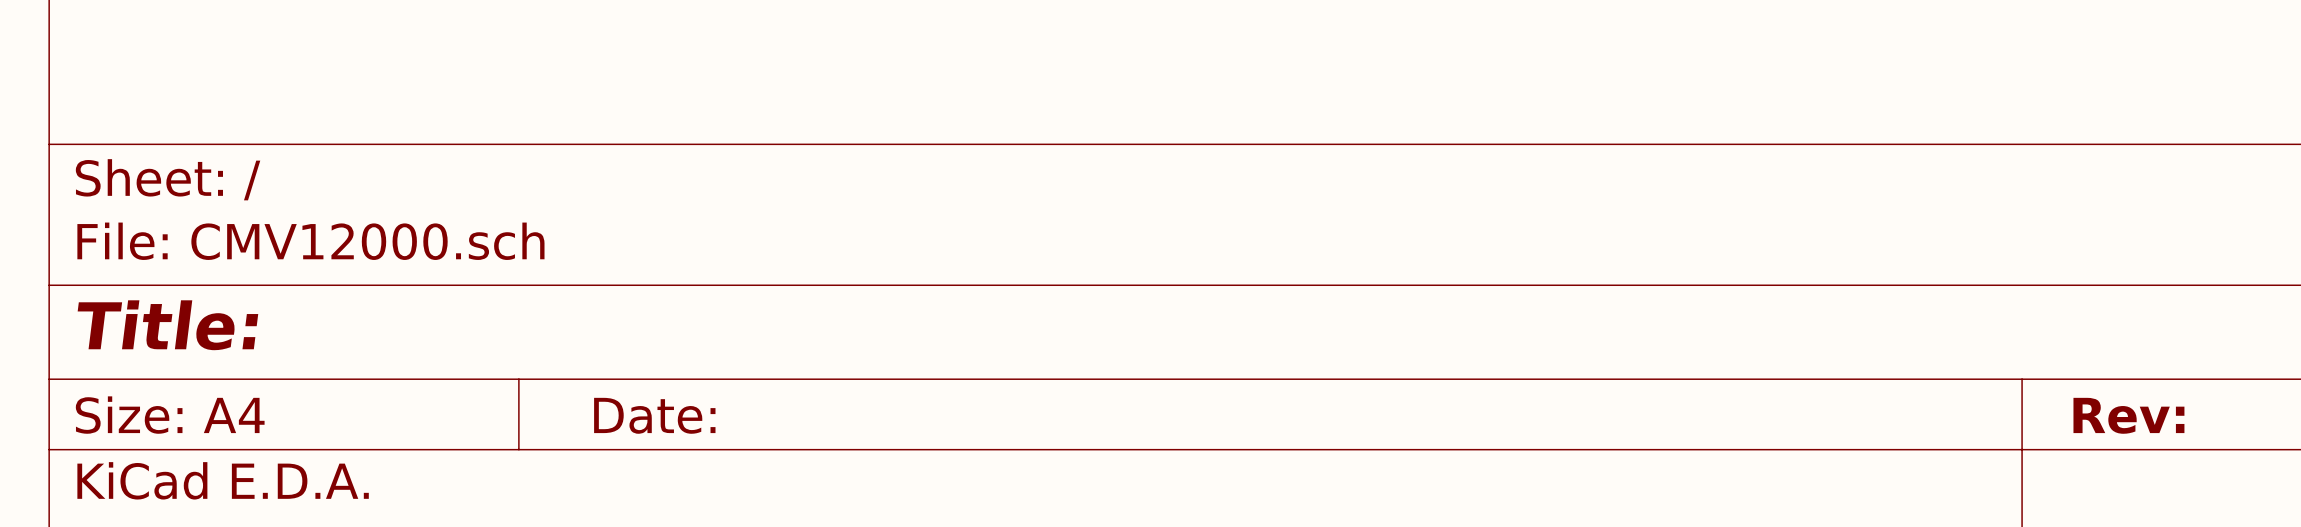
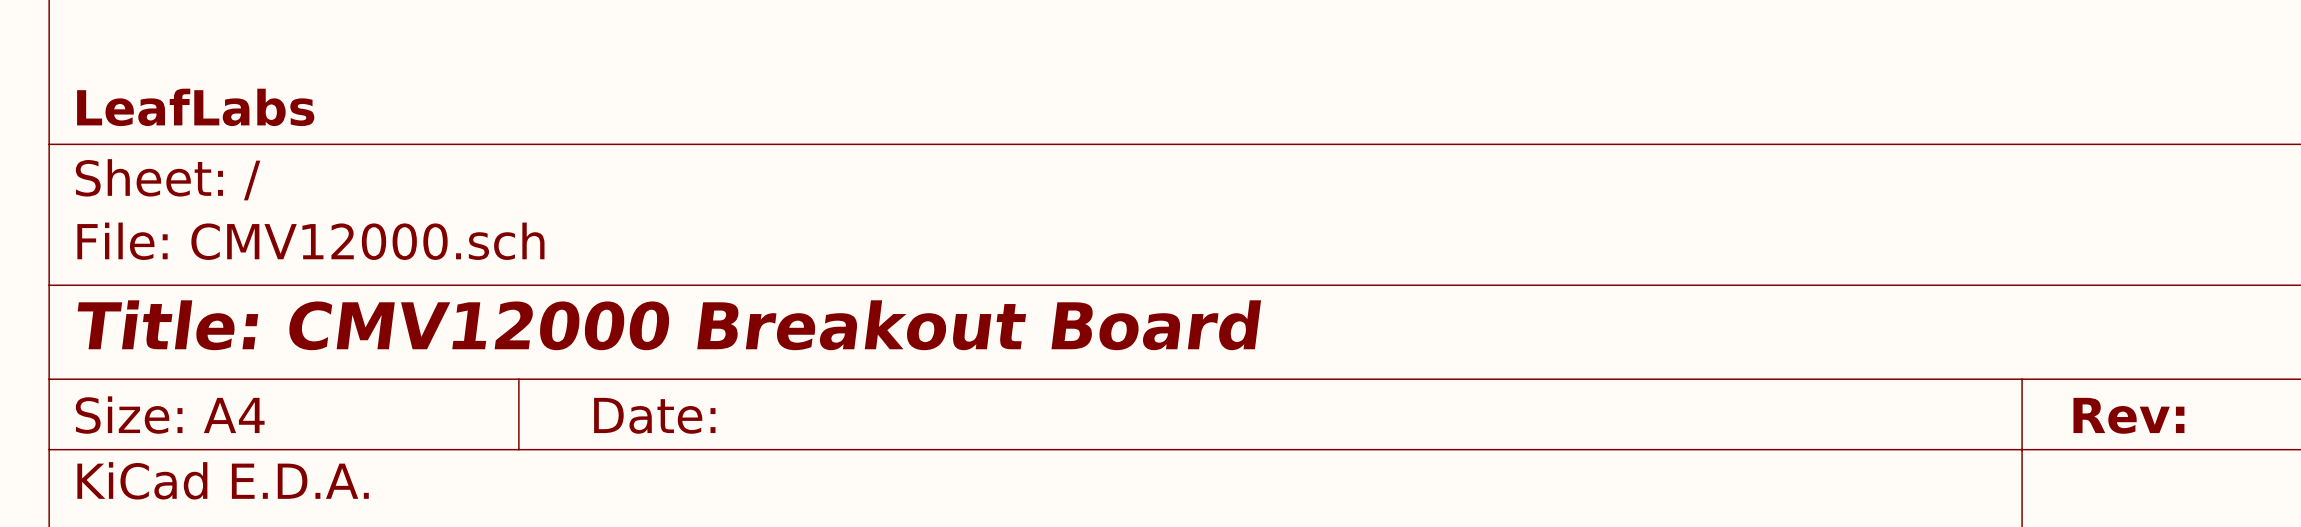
title block: none -> LeafLabs (195, 107)
title block: Title: (167, 325) -> Title: CMV12000 Breakout Board (669, 325)

